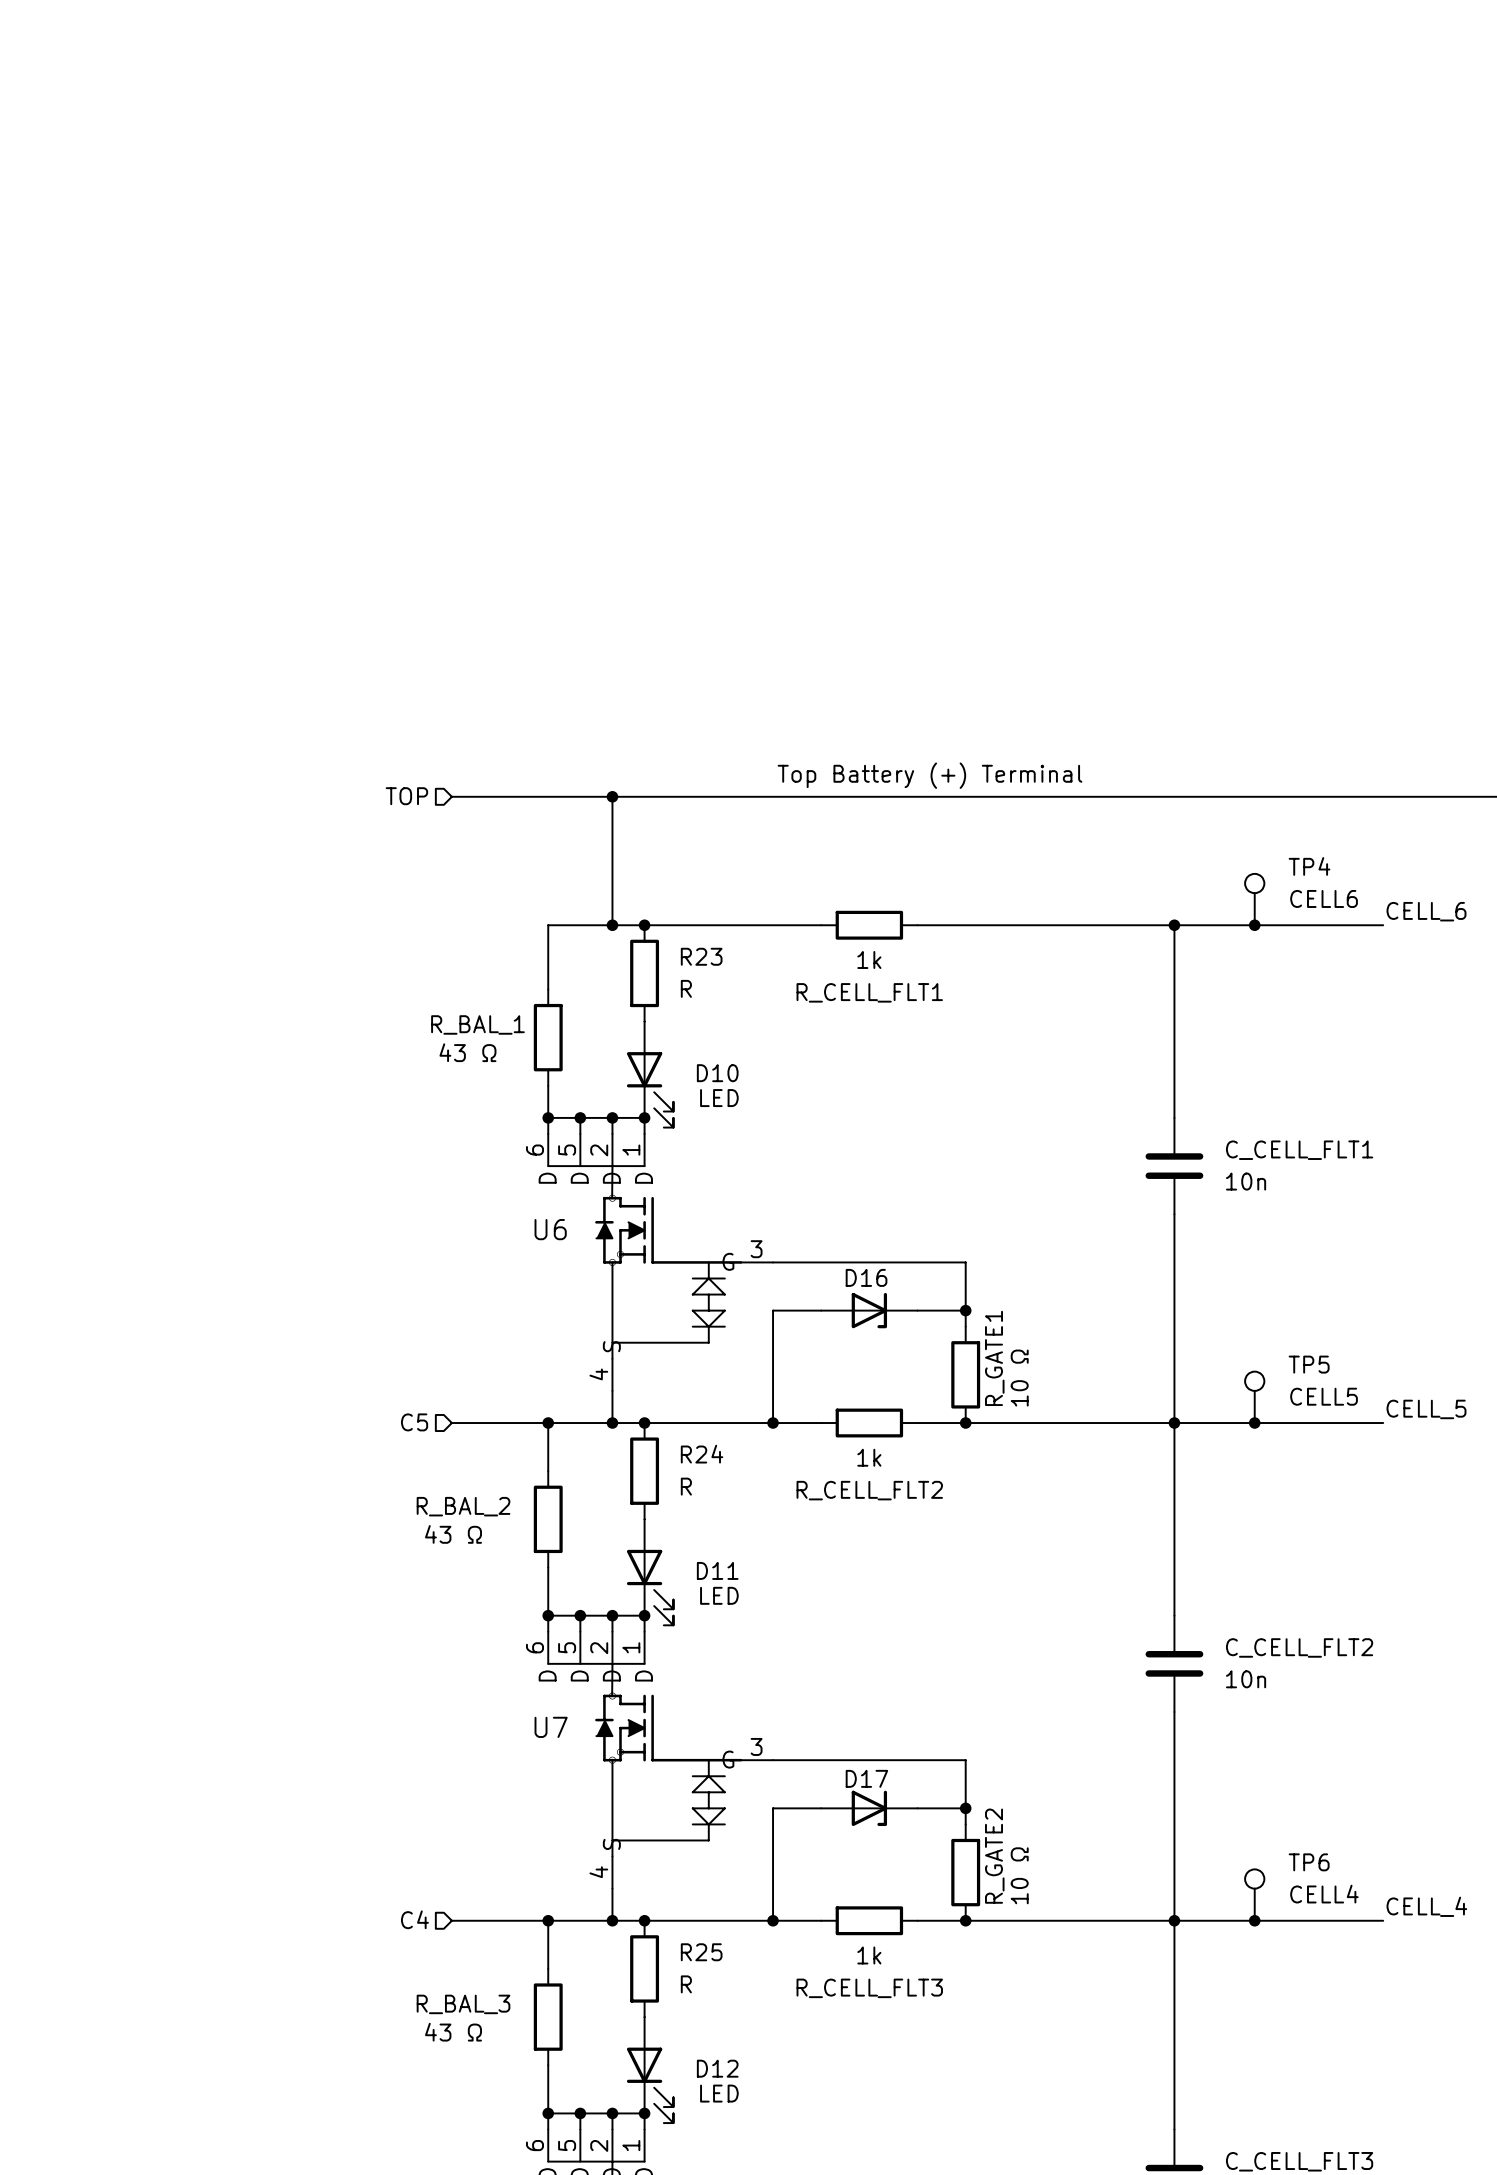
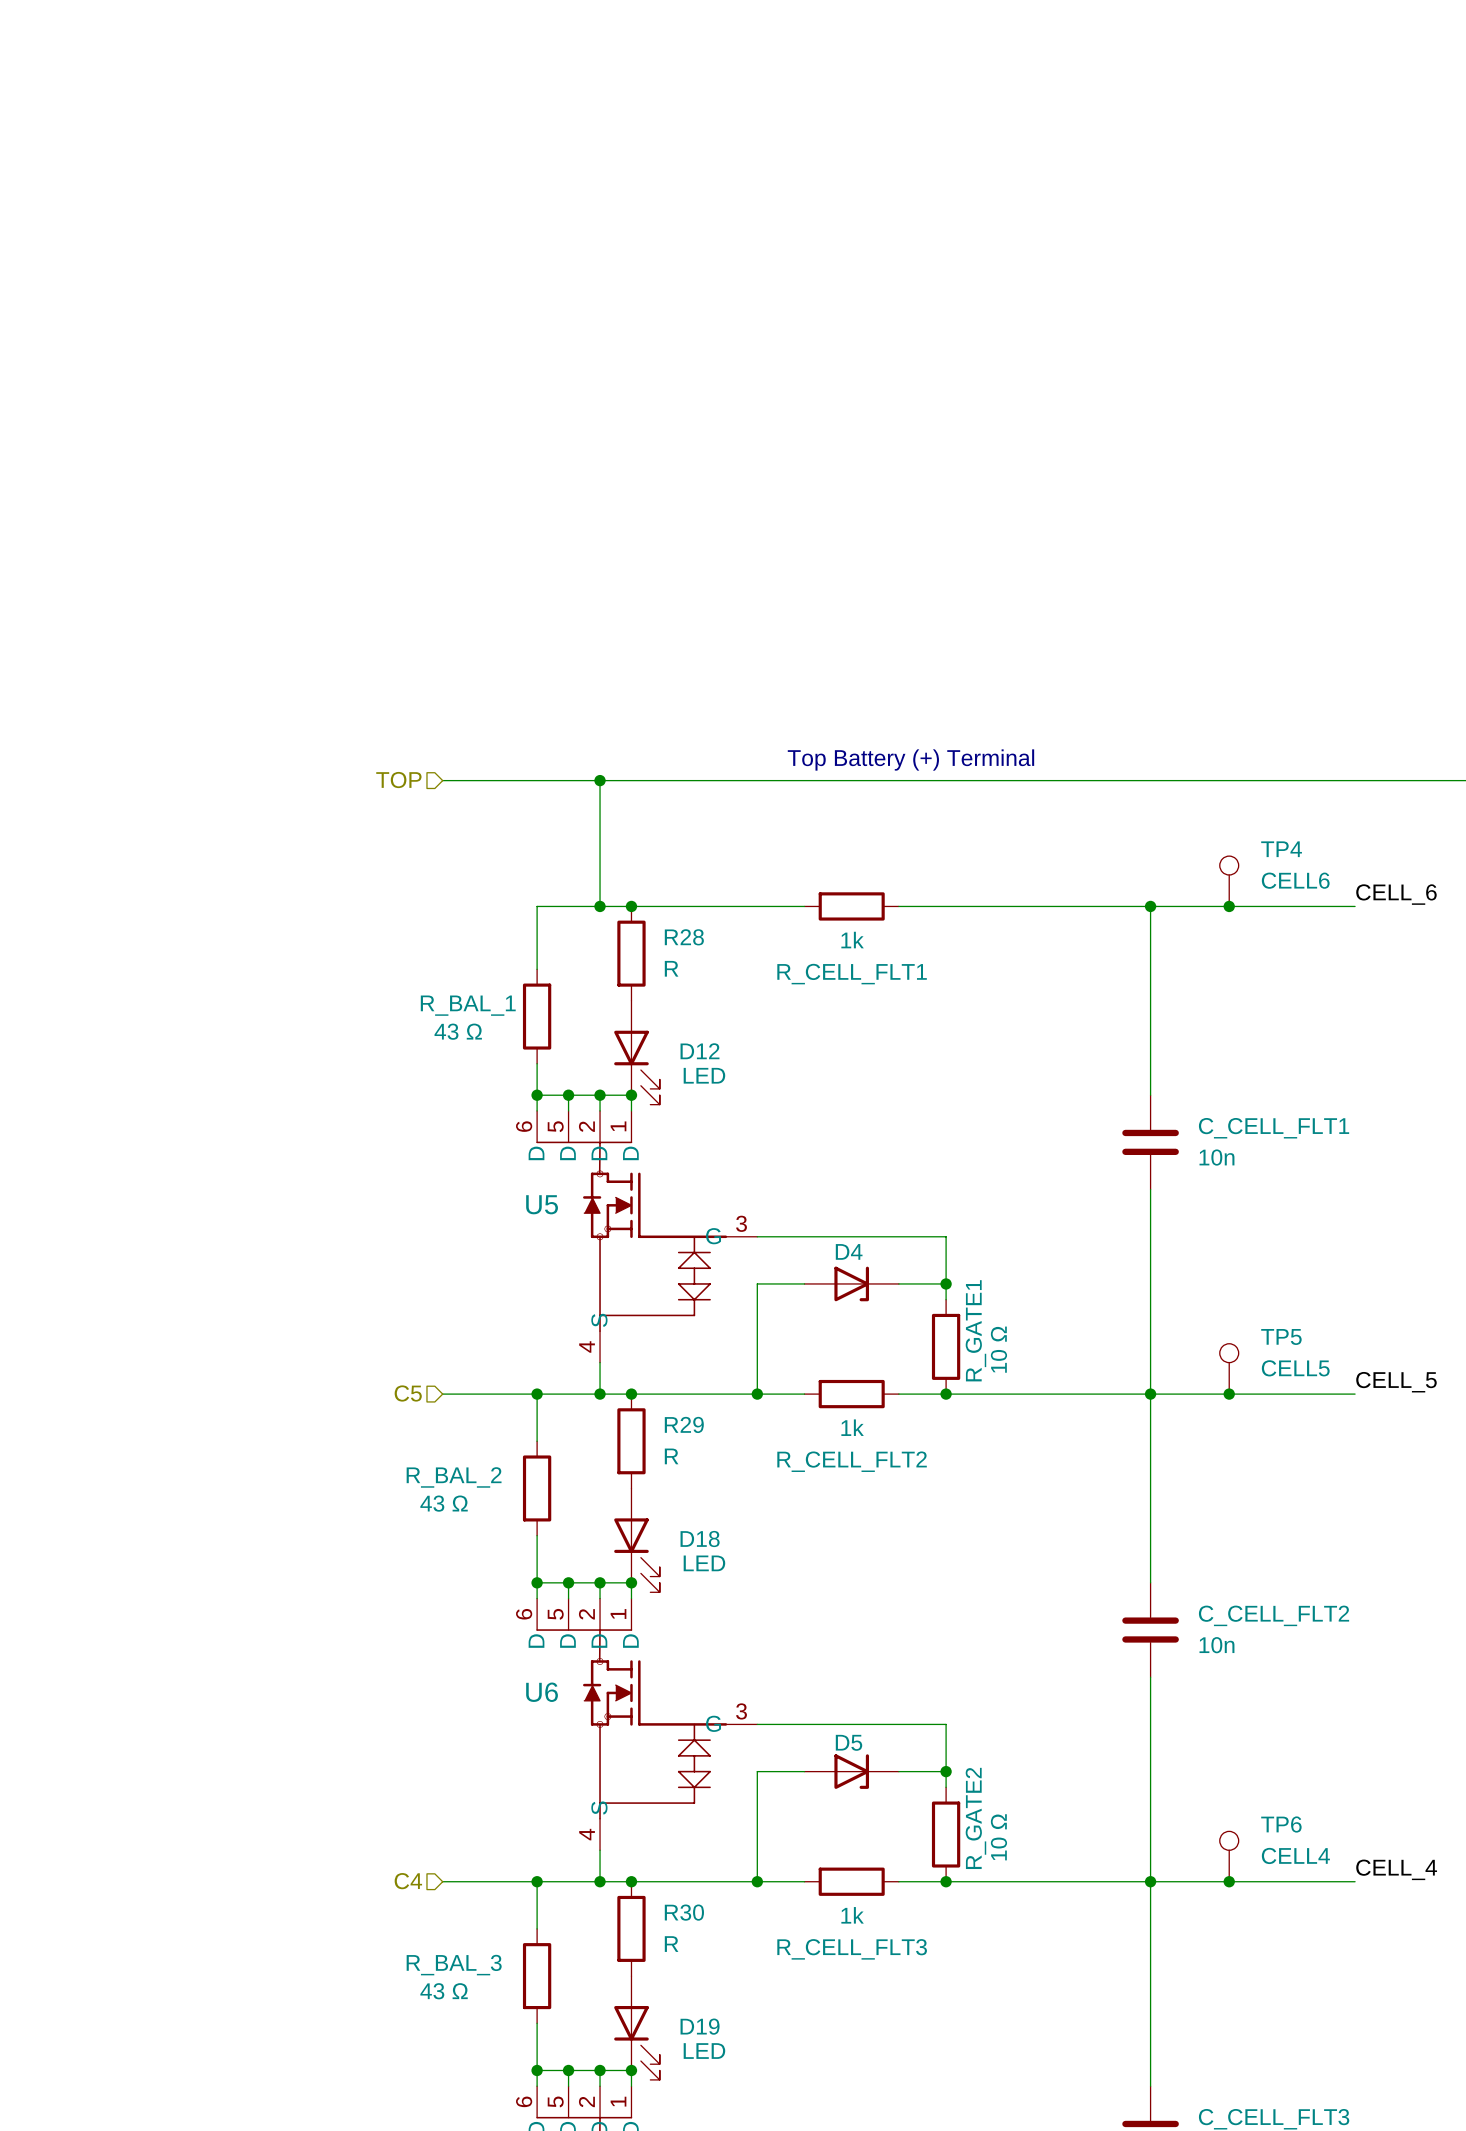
R23 name: R23 (701, 956) -> R28 (684, 937)
D10 name: D10 (717, 1073) -> D12 (700, 1051)
U6 name: U6 (550, 1229) -> U5 (542, 1204)
D16 name: D16 (866, 1277) -> D4 (849, 1251)
R24 name: R24 (702, 1454) -> R29 (684, 1424)
D11 name: D11 (717, 1570) -> D18 (700, 1539)
U7 name: U7 (551, 1727) -> U6 (542, 1692)
D17 name: D17 (866, 1778) -> D5 (849, 1742)
R25 name: R25 (701, 1952) -> R30 (684, 1912)
D12 name: D12 (717, 2068) -> D19 (700, 2026)

